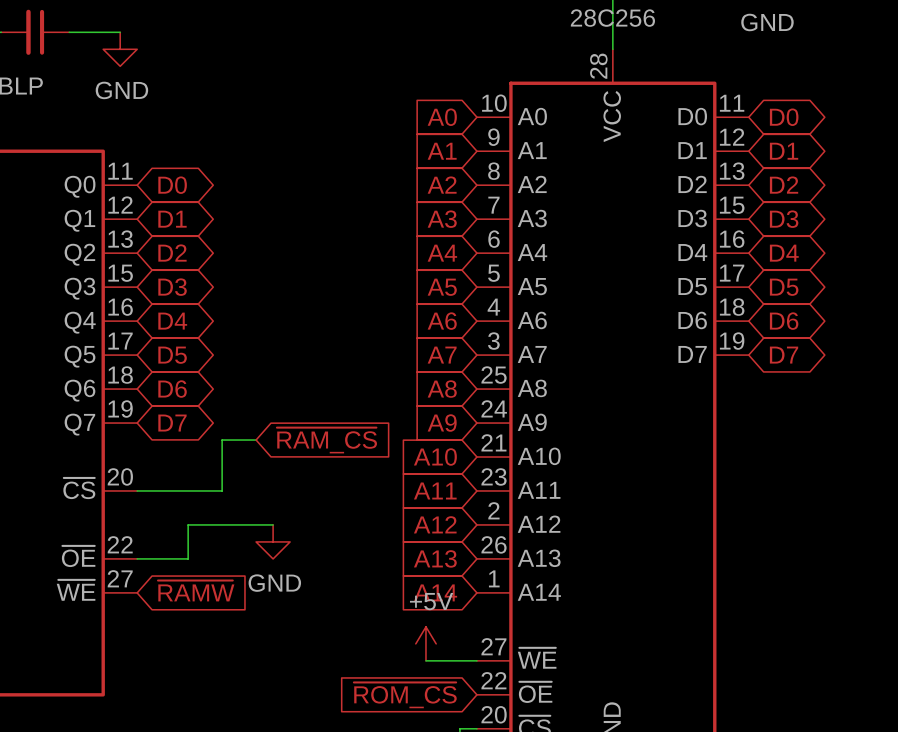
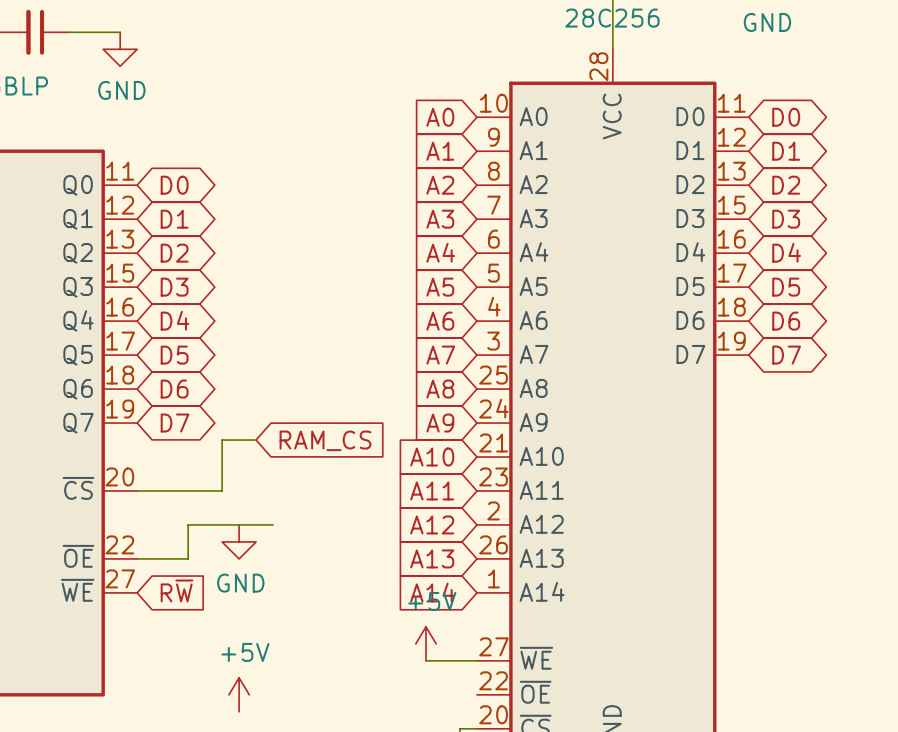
global label: ~{RAM_CS} (326, 440) -> RAM_CS (325, 440)
power symbol position: GND (273, 541) -> GND (239, 541)
global label: ~{RAMW} (196, 590) -> R~{W} (177, 590)
power symbol: none -> +5V (239, 694)
global label: ~{ROM_CS} (405, 695) -> none

